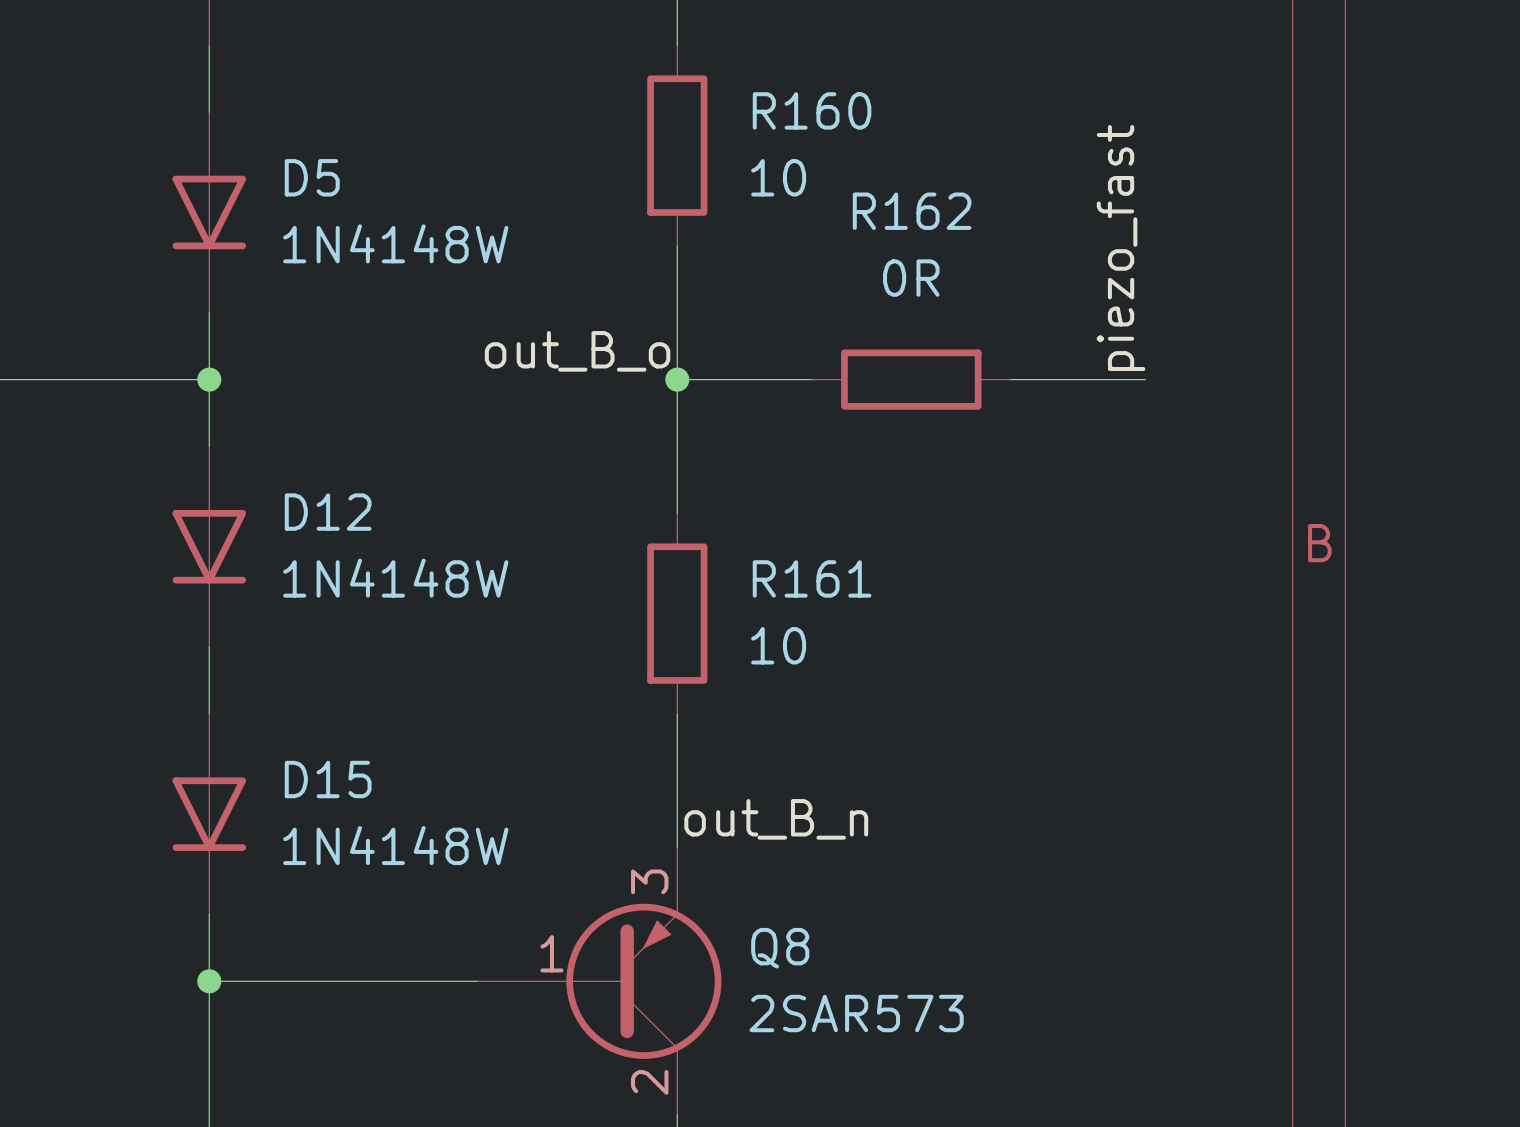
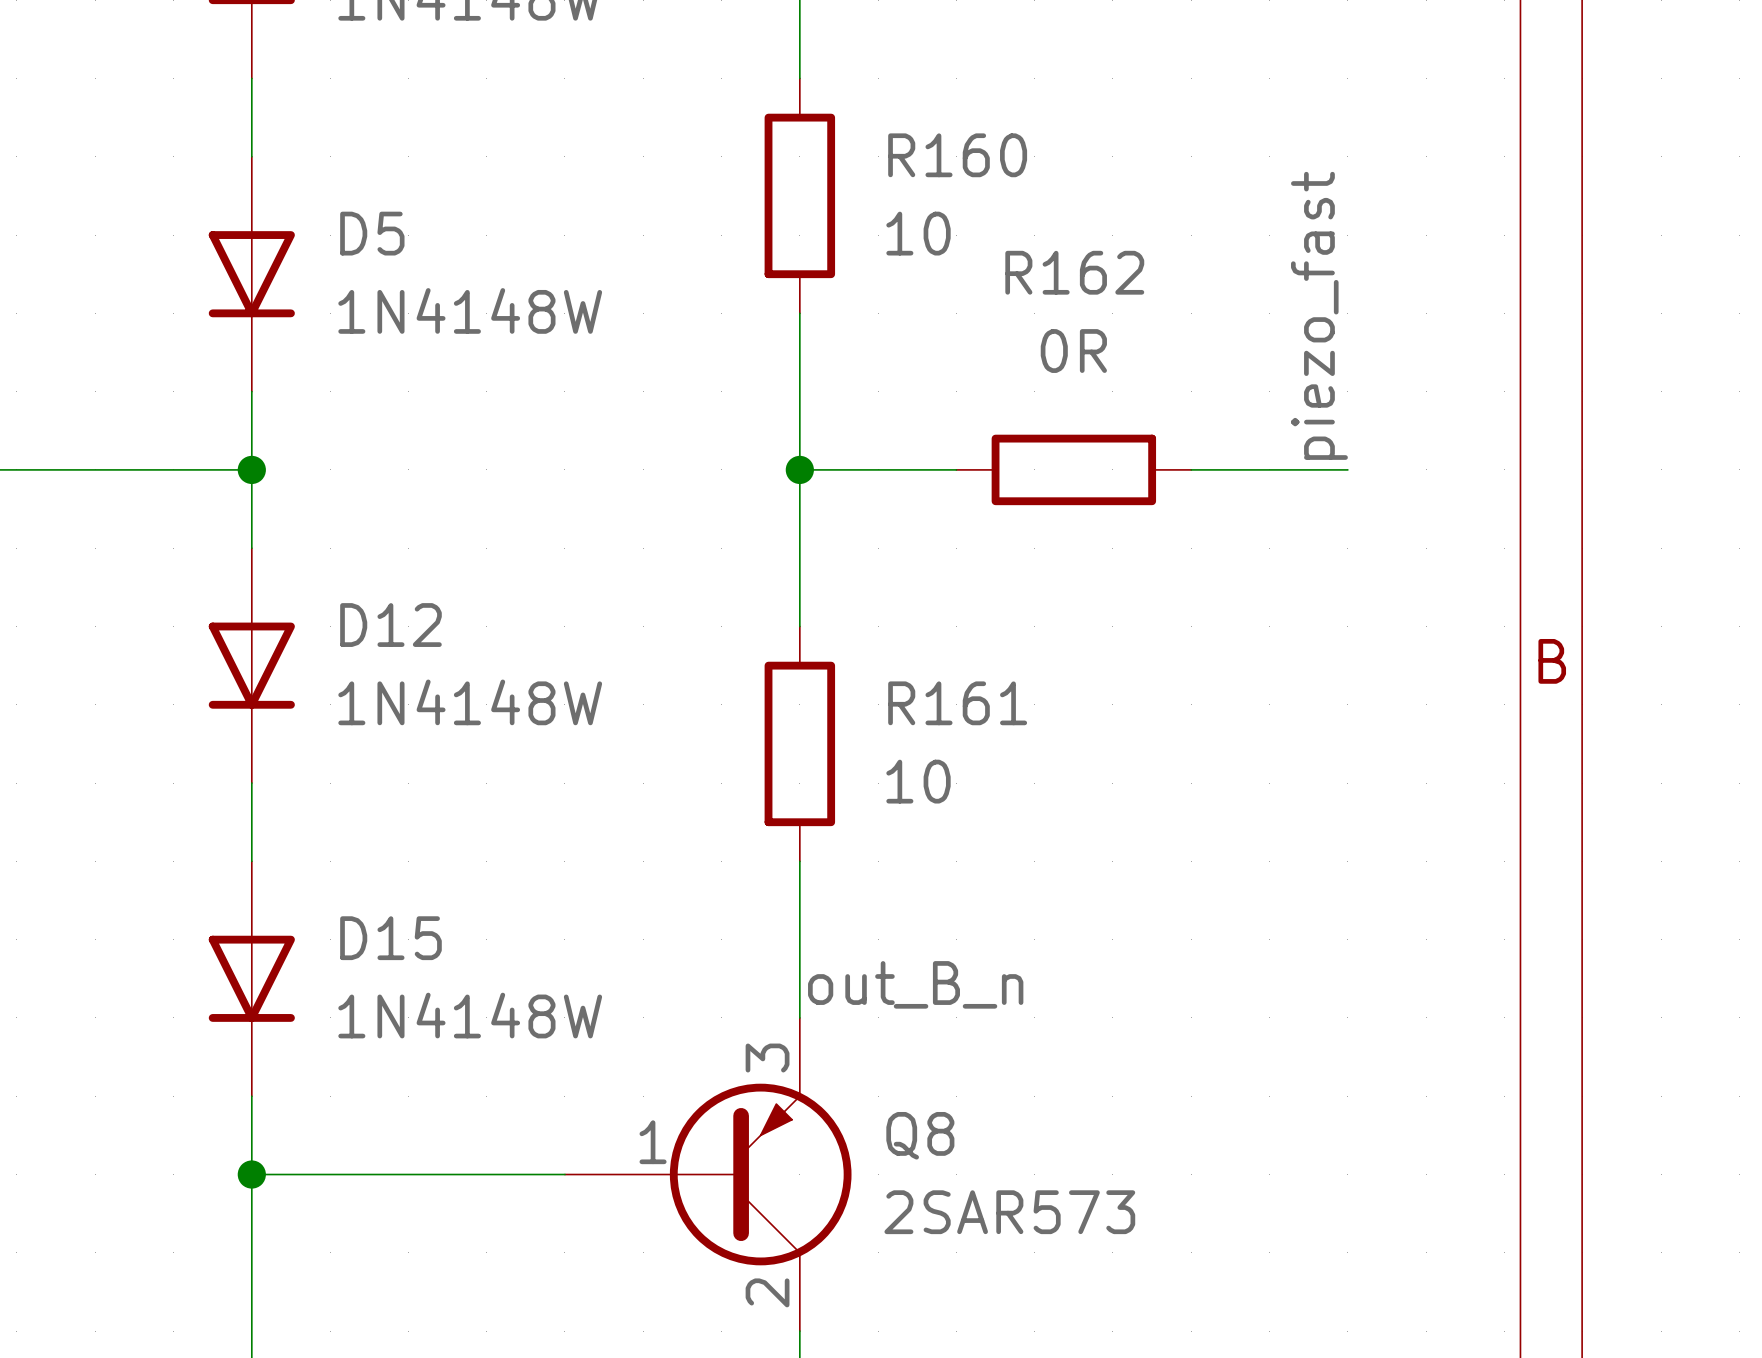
label: out_B_o (577, 351) -> none

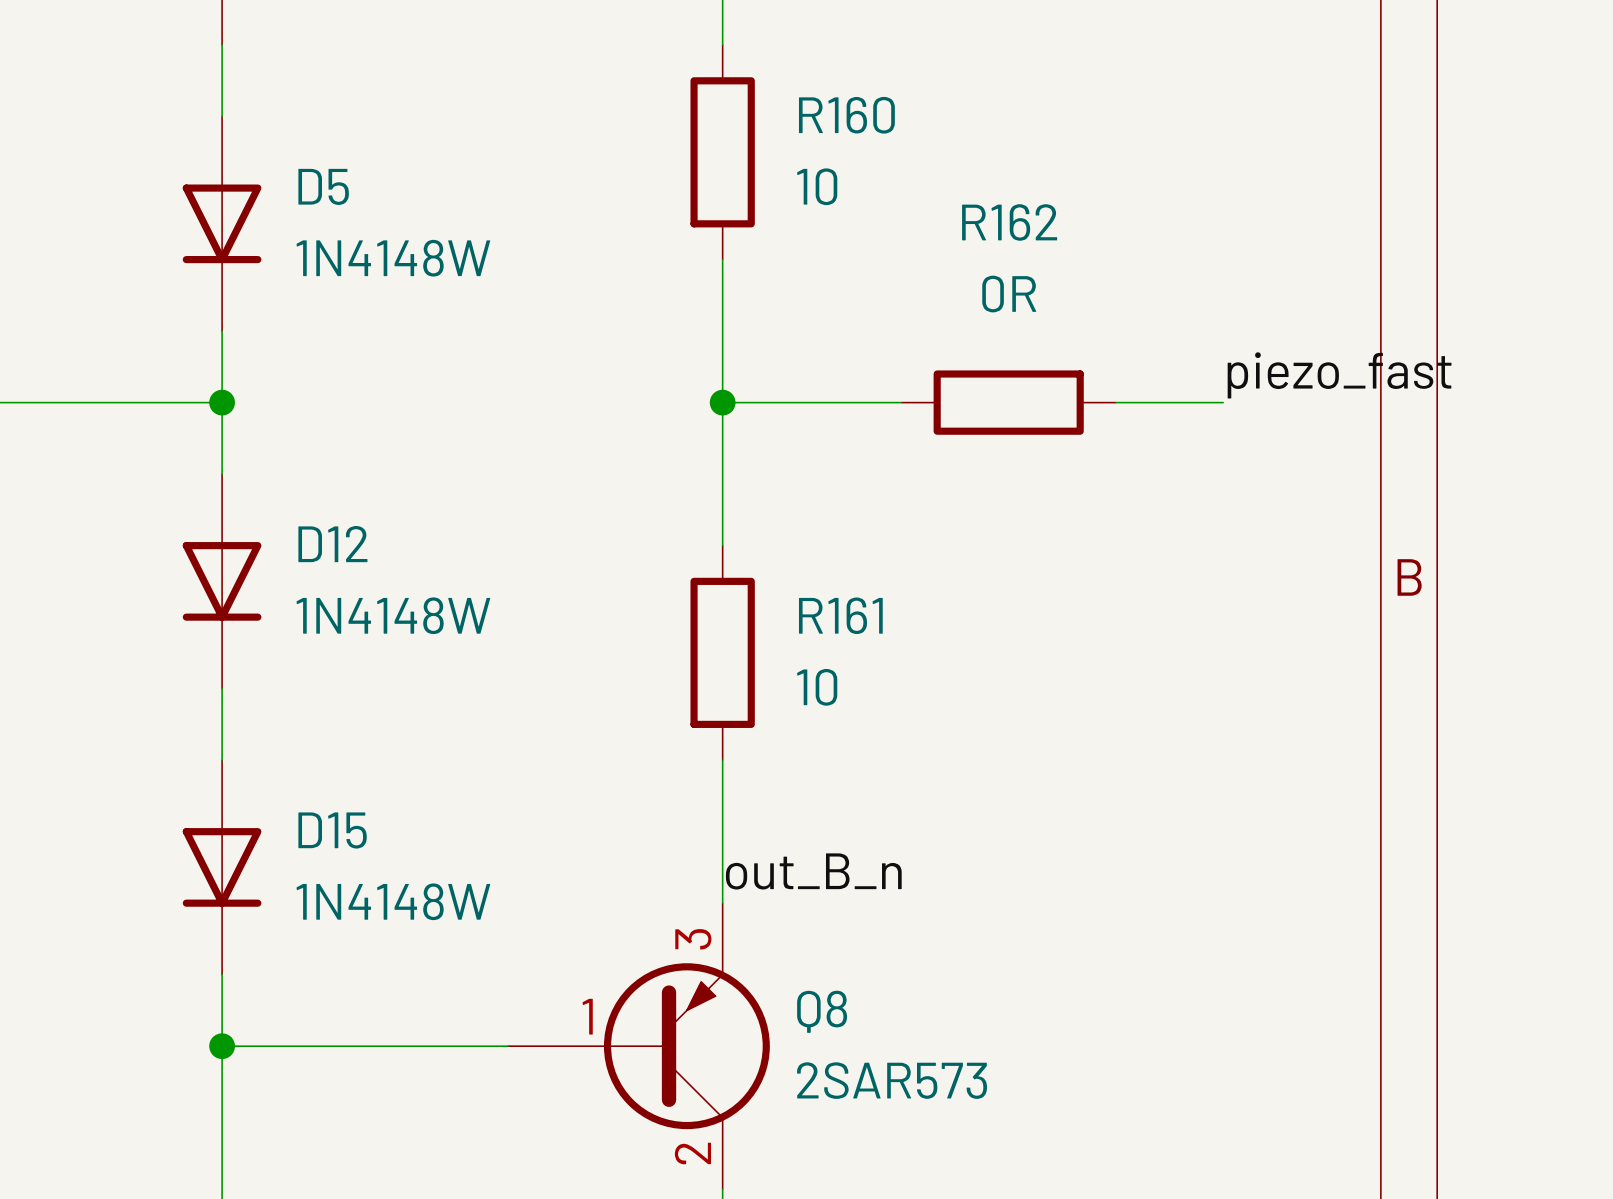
label rotation: 0° (1319, 315) -> 90° clockwise (1339, 375)
R162 position: (1073, 469) -> (1008, 402)

